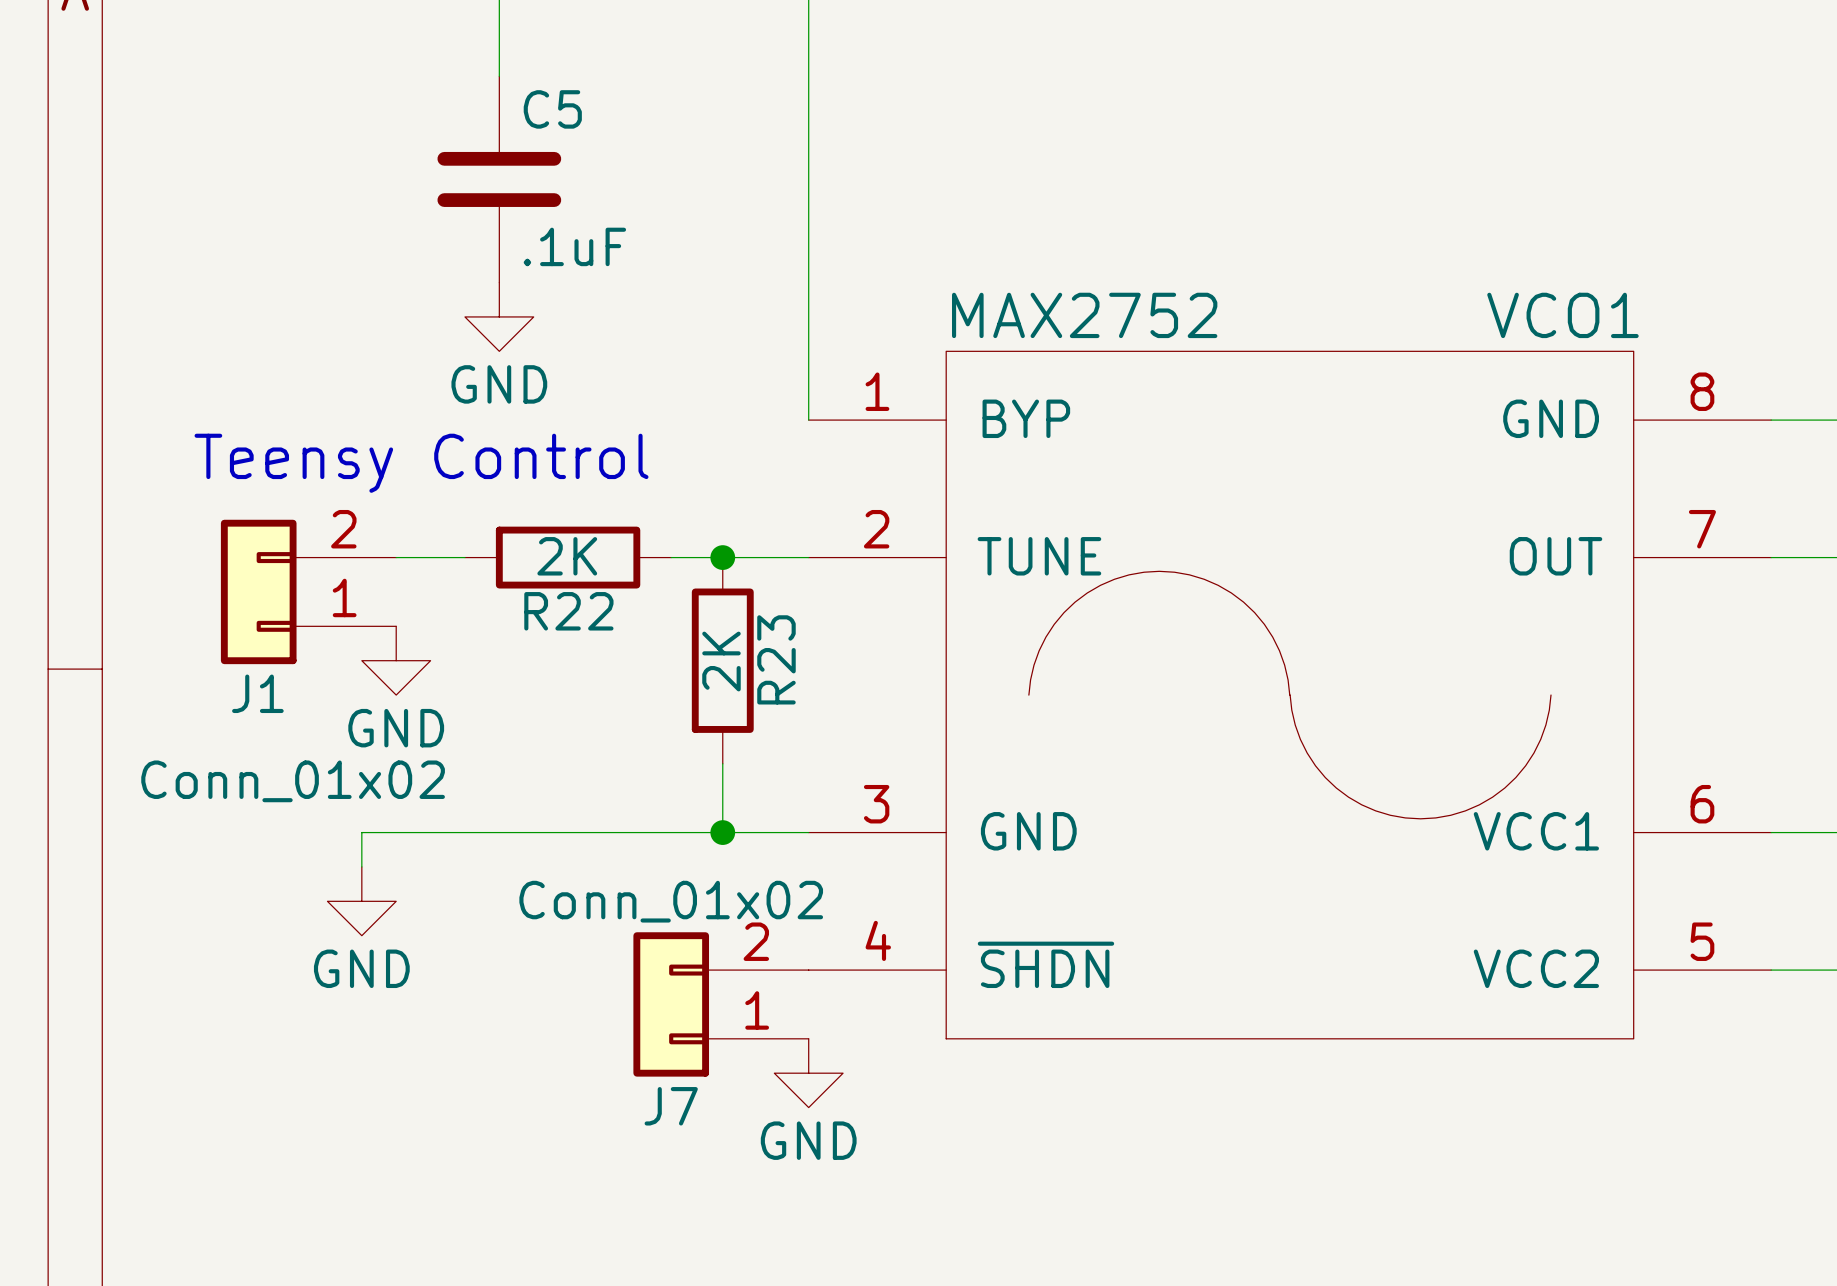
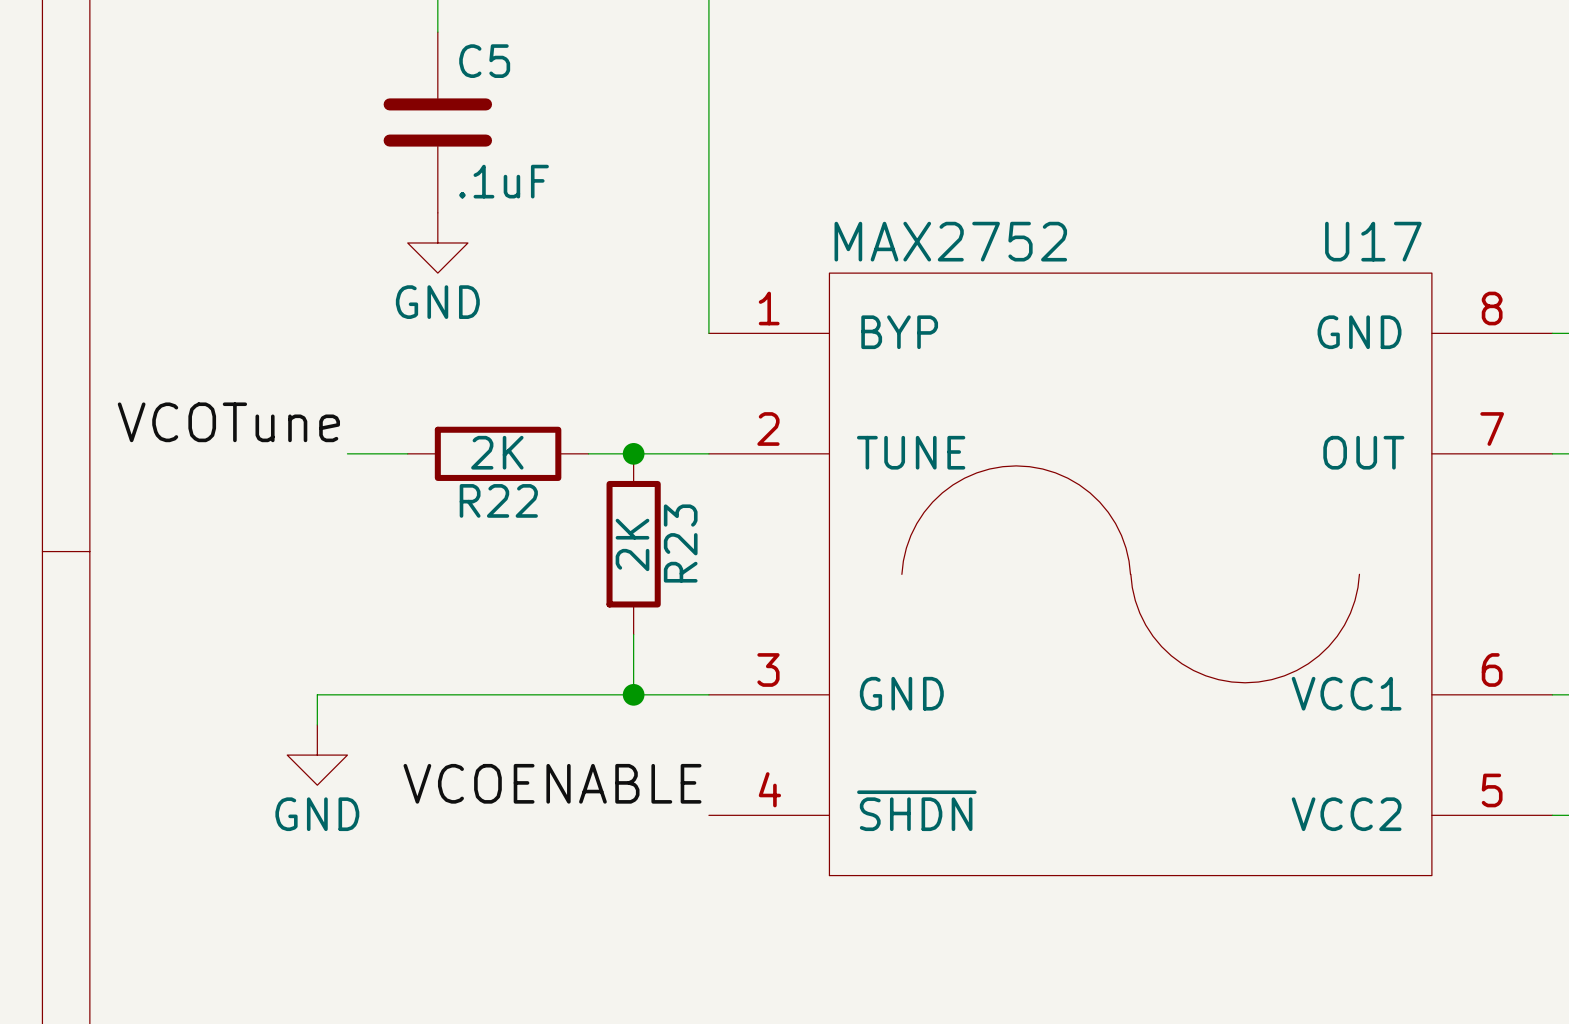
VCO1 name: VCO1 (1562, 315) -> U17 (1373, 241)
text: Teensy Control (421, 463) -> none
label: none -> VCOTune (228, 422)
J1: Conn_01x02 (308, 591) -> none
power symbol: GND (396, 660) -> none
label: none -> VCOENABLE (552, 783)
J7: Conn_01x02 (721, 1004) -> none
power symbol: GND (808, 1073) -> none

